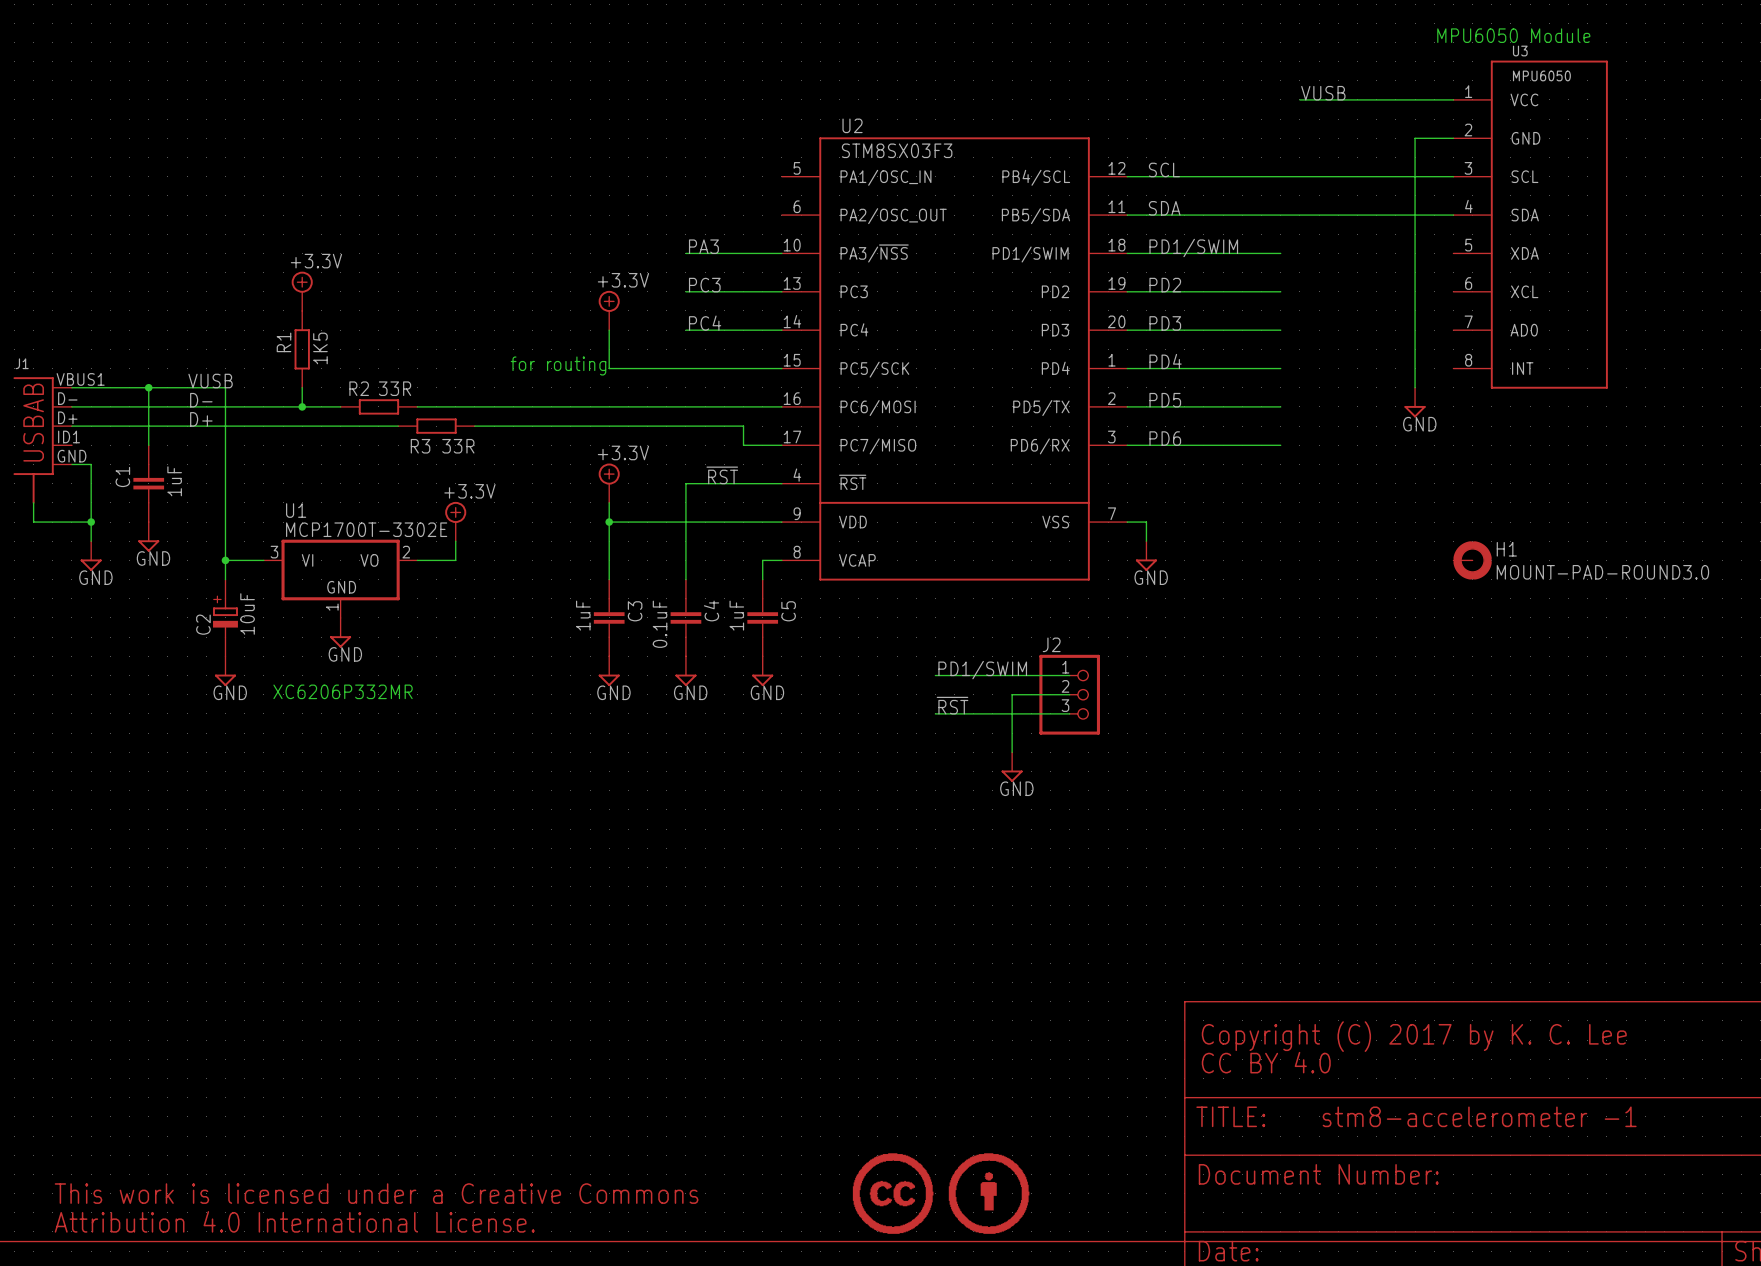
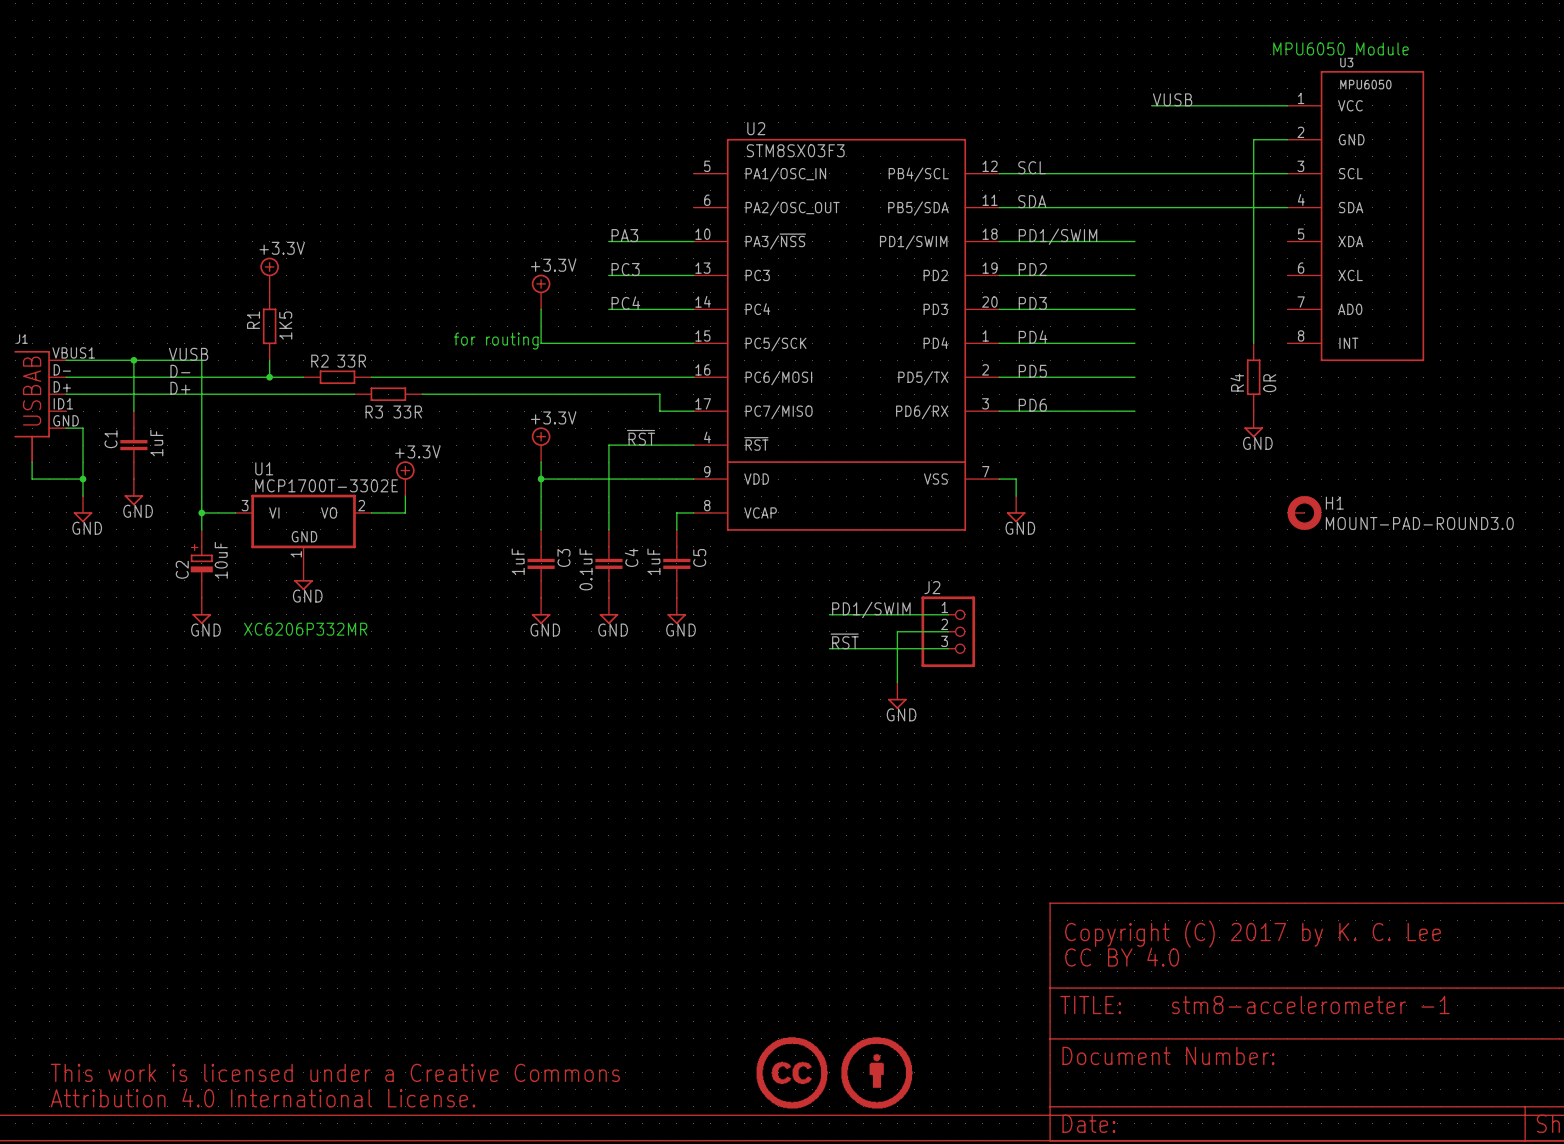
power symbol position: GND (1415, 402) -> GND (1253, 424)
R4: none -> 0R (1253, 377)

